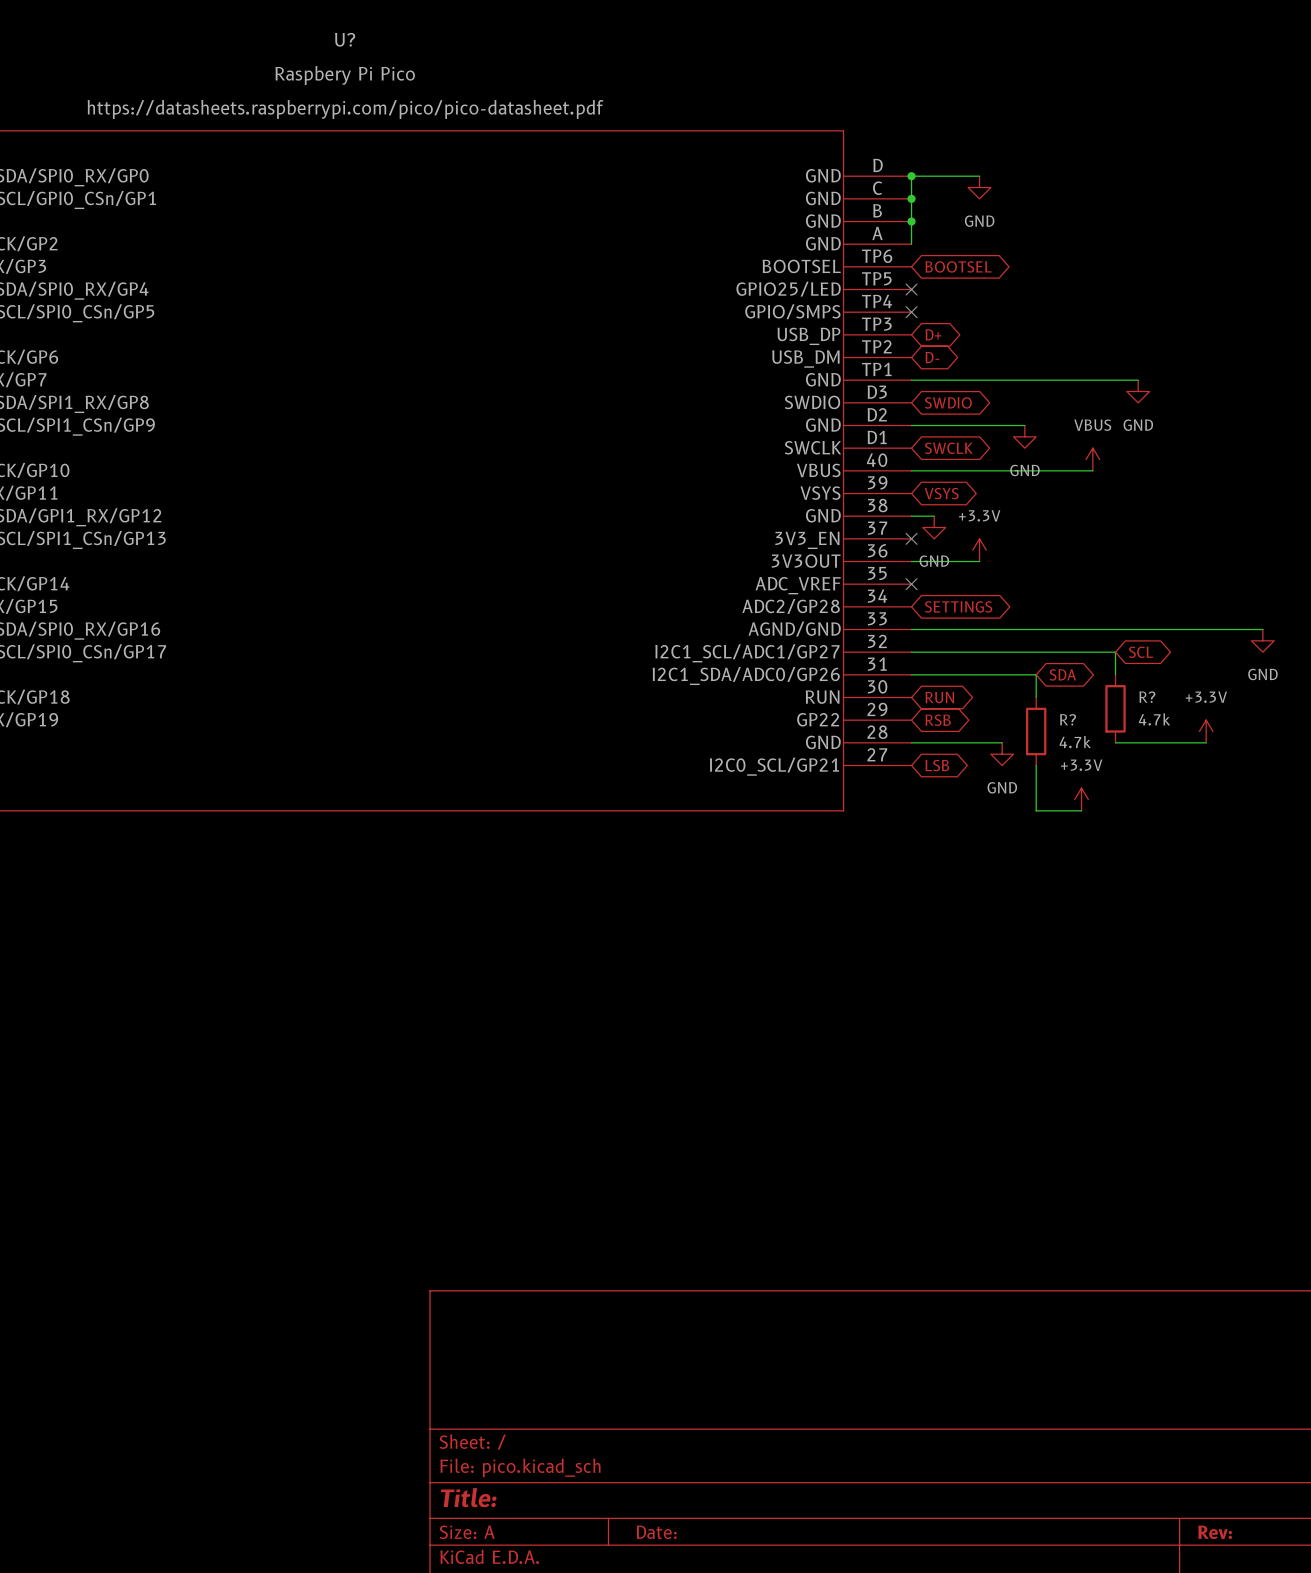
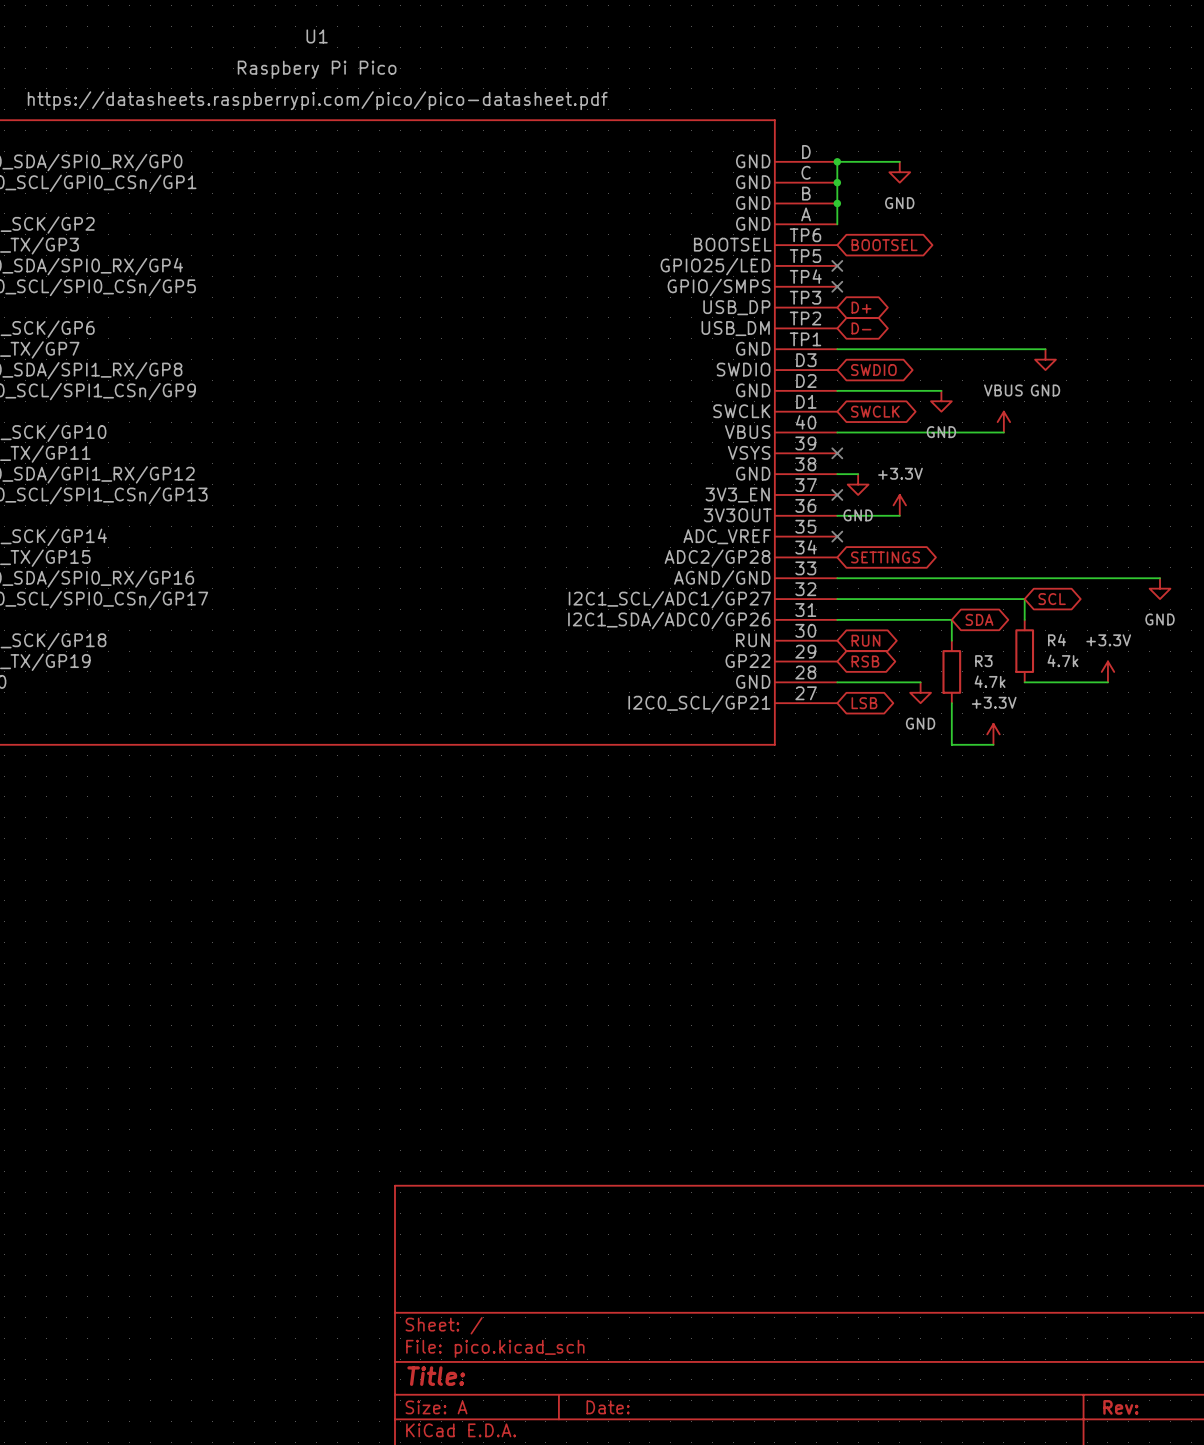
U? name: U? (345, 39) -> U1 (317, 36)
no-connect mark: none -> (837, 453)
global label: VSYS (941, 493) -> none
R? name: R? (1147, 697) -> R4 (1056, 640)
R? name: R? (1068, 719) -> R3 (983, 661)

